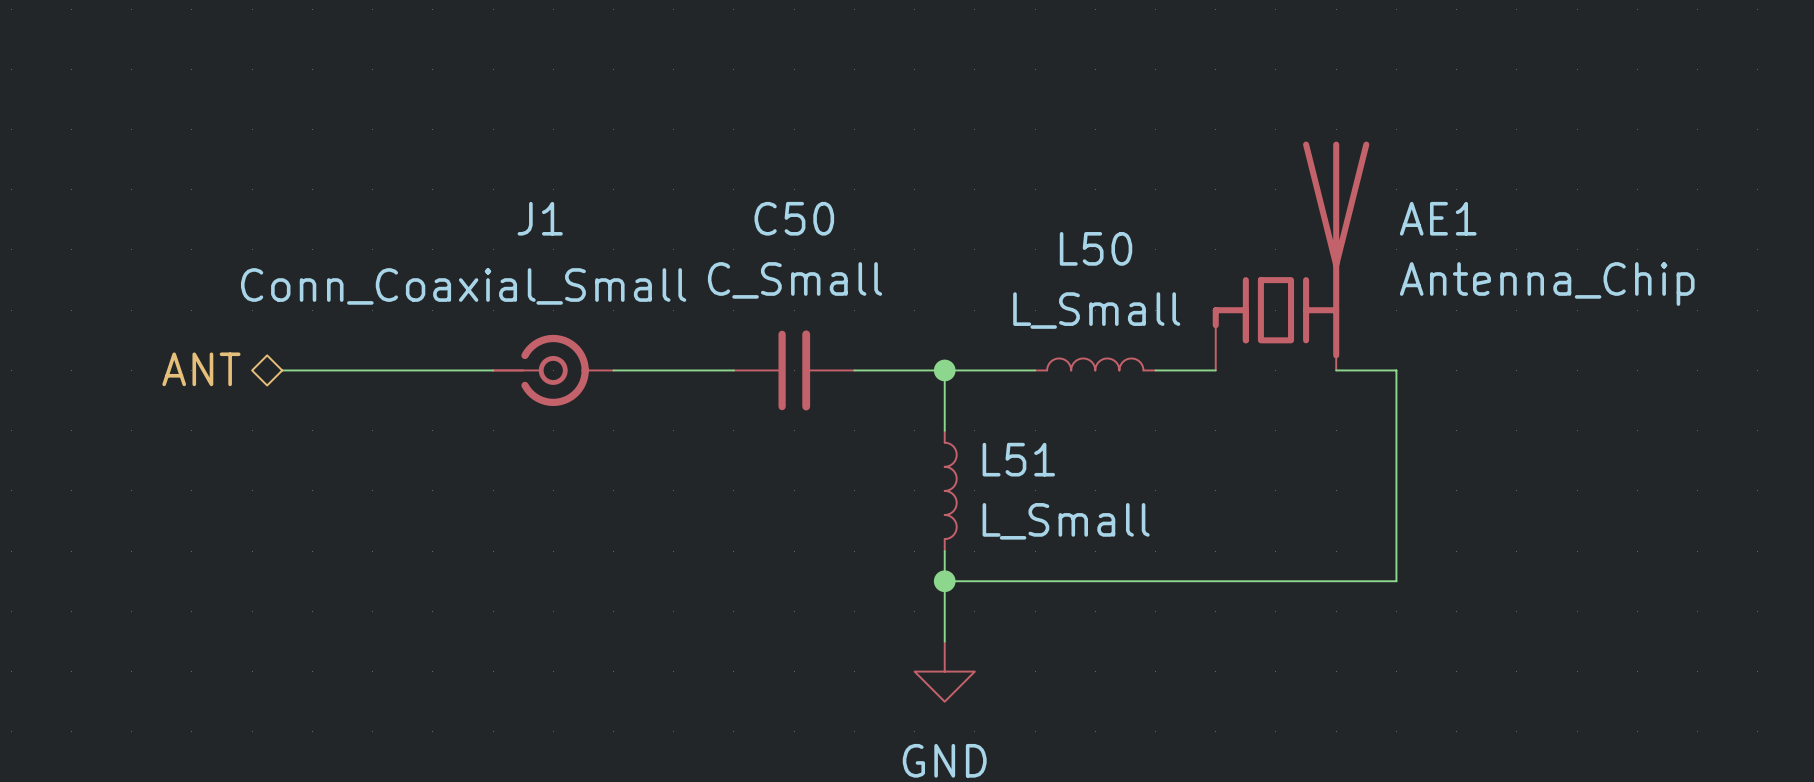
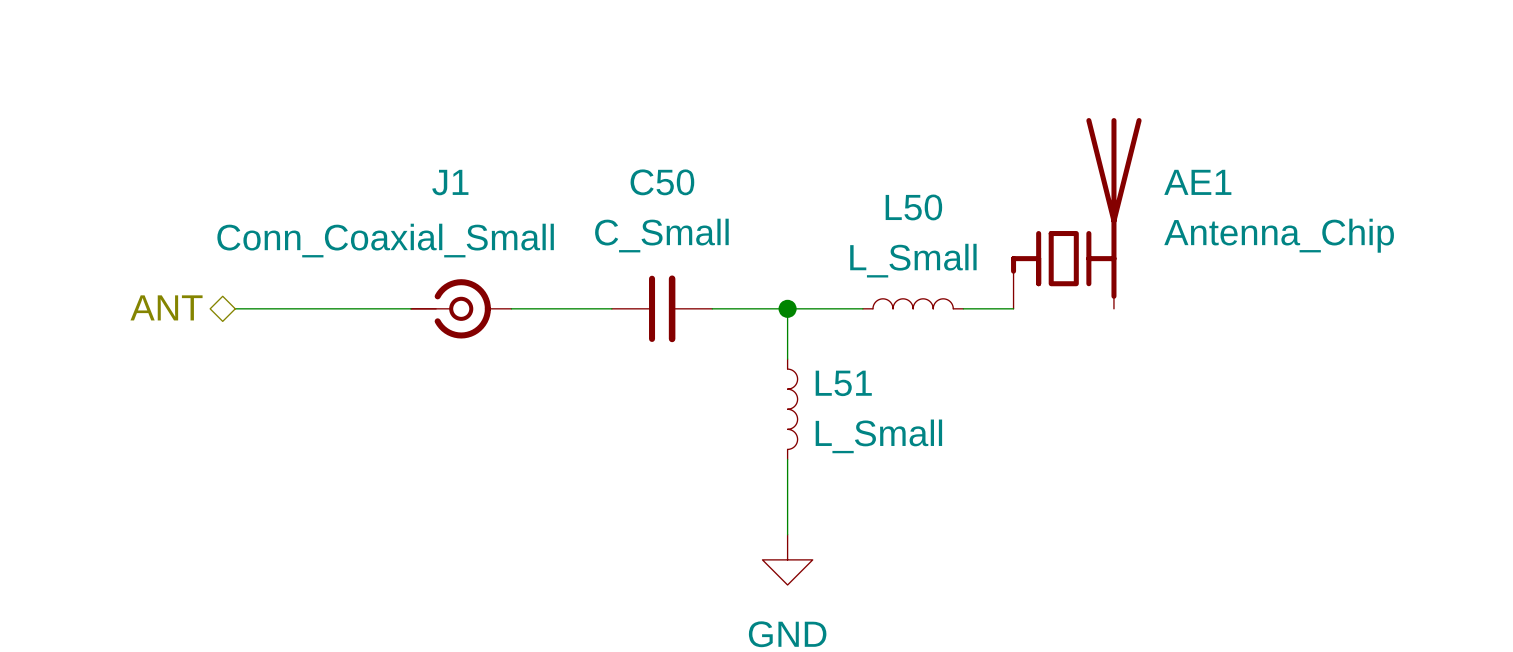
wire: (1336, 370) (1396, 370) (1396, 581) (944, 581) -> none
junction: (944, 581) -> none

